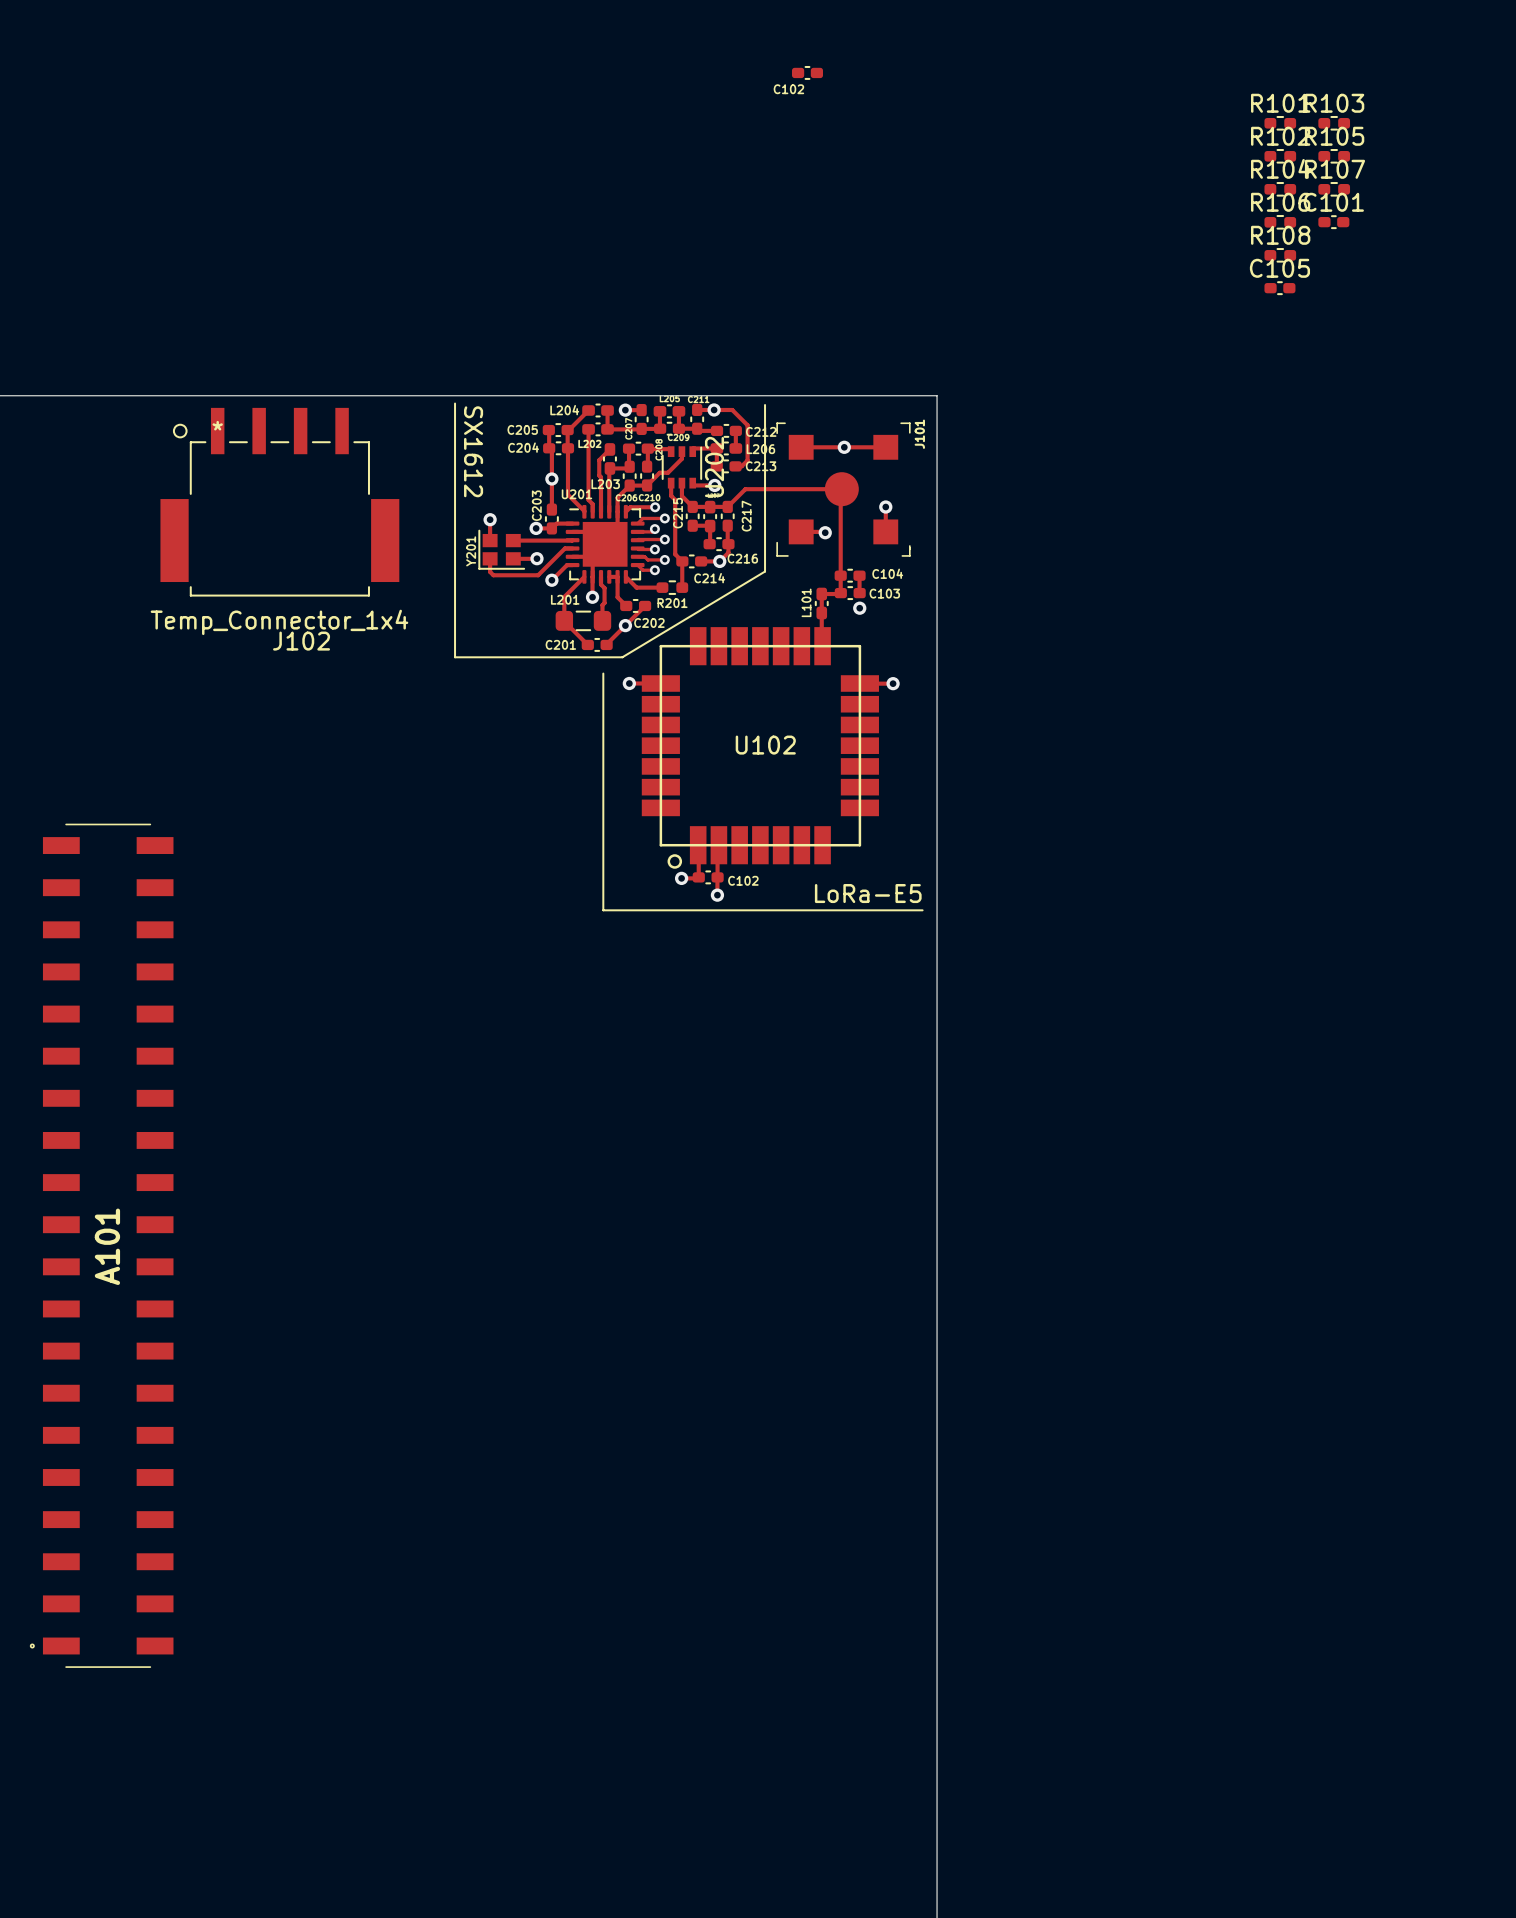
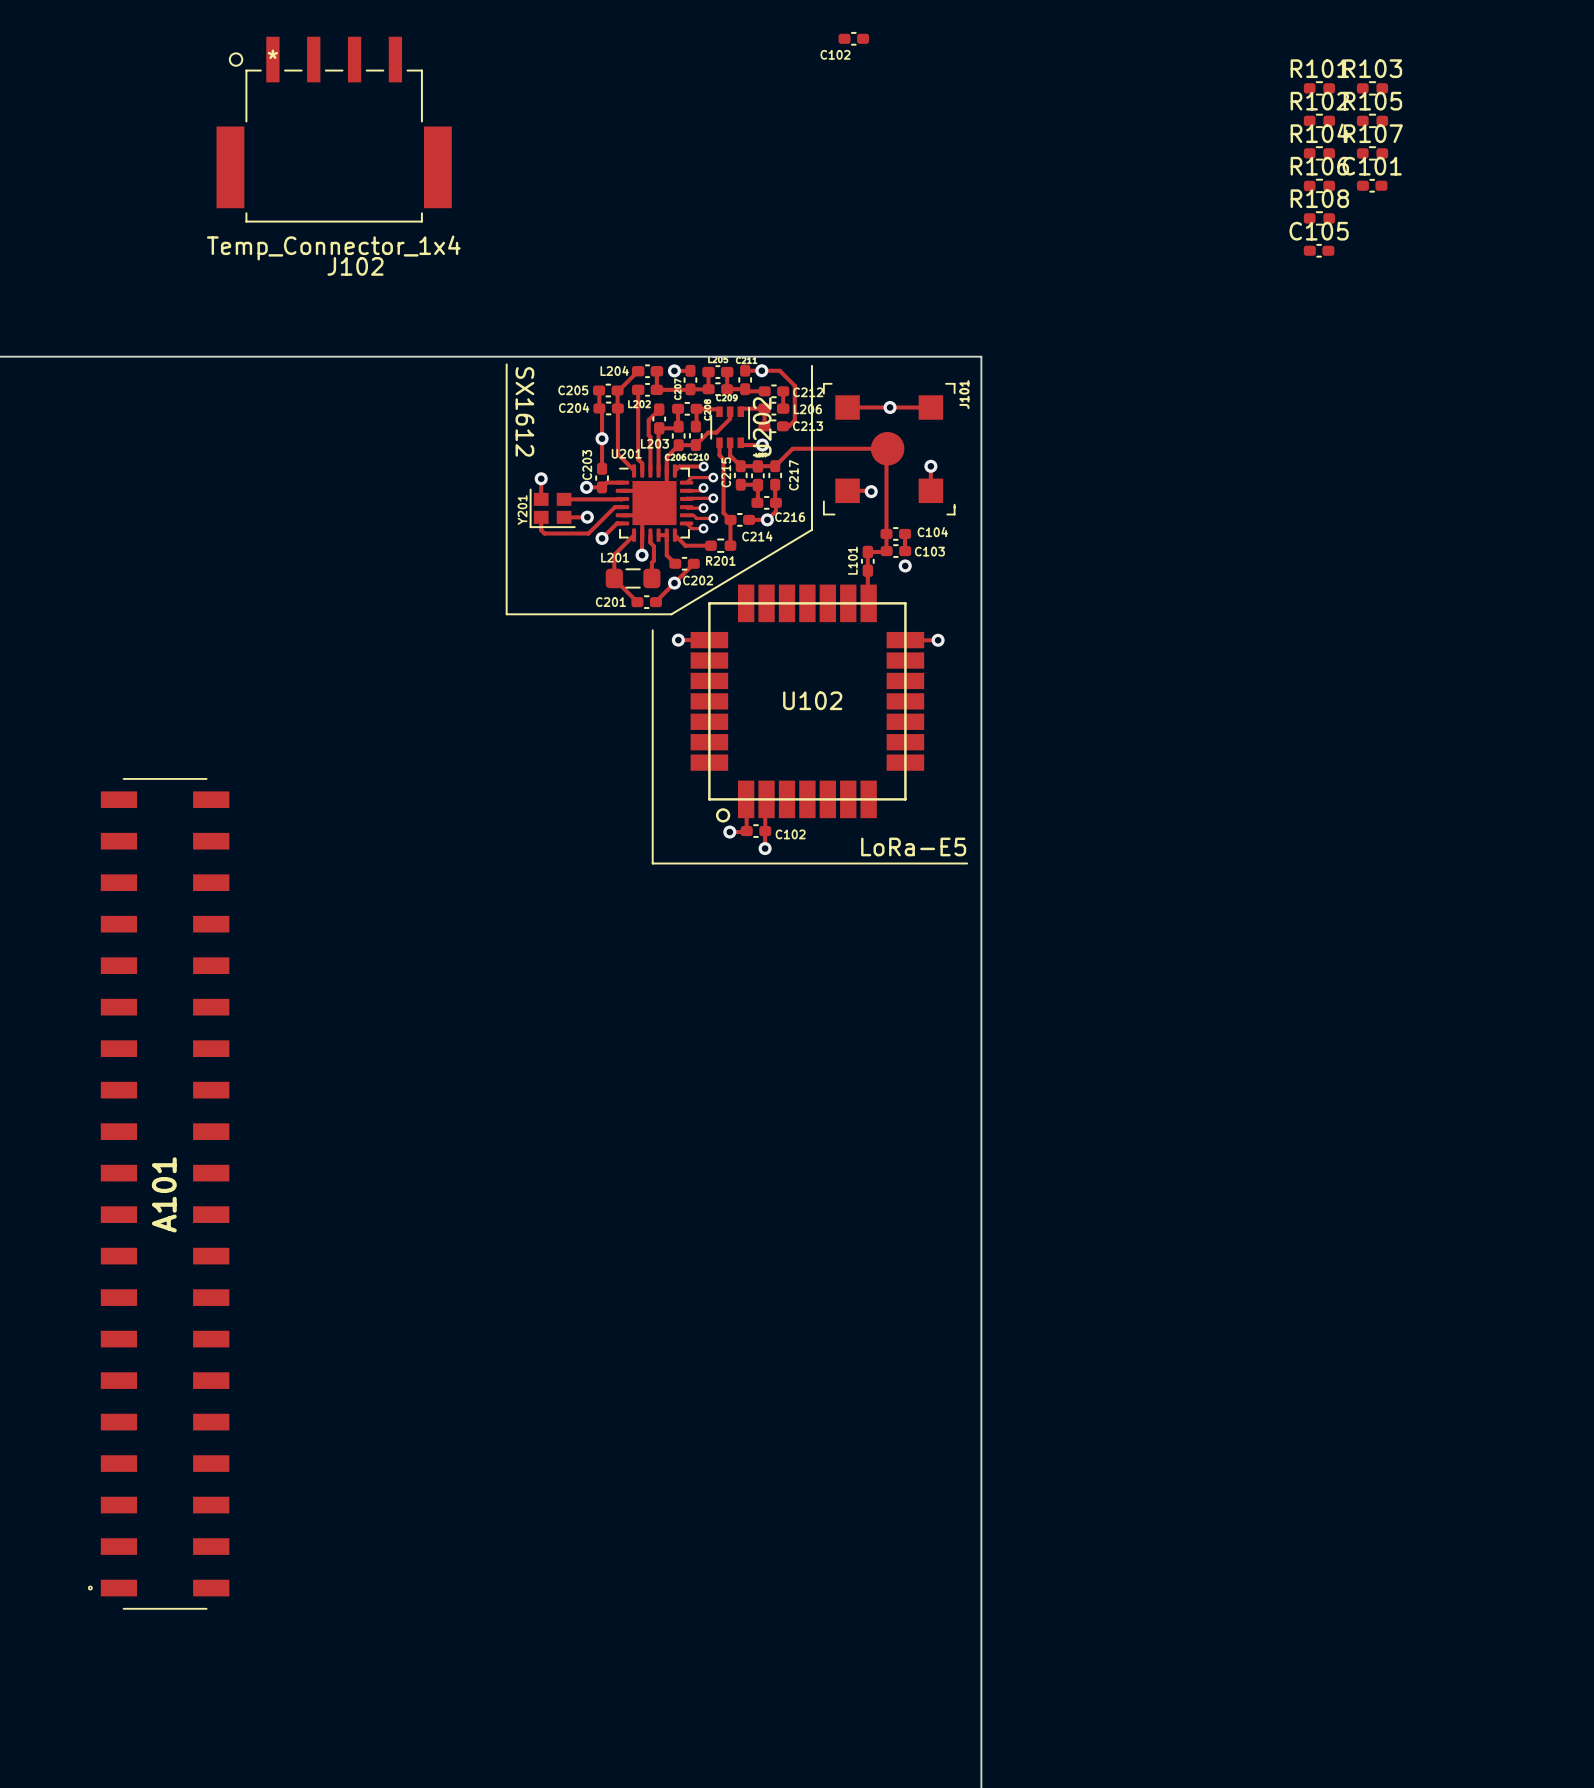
J102 position: (279, 502) -> (334, 129)

